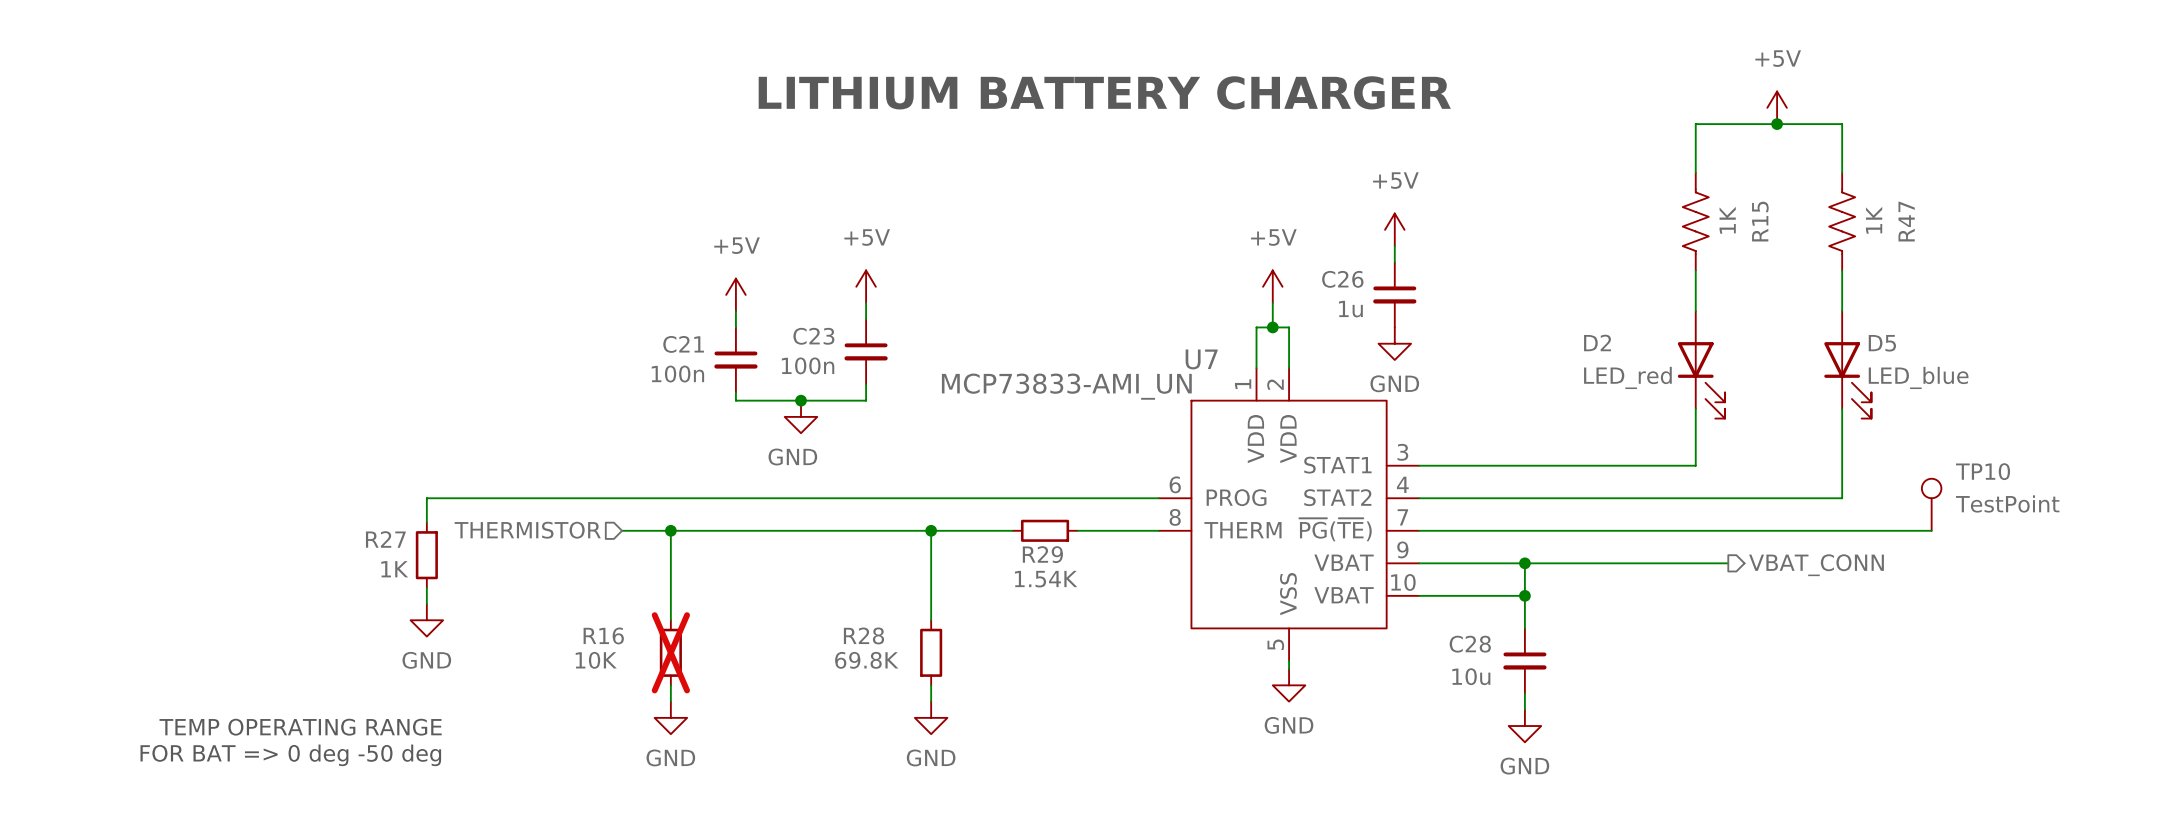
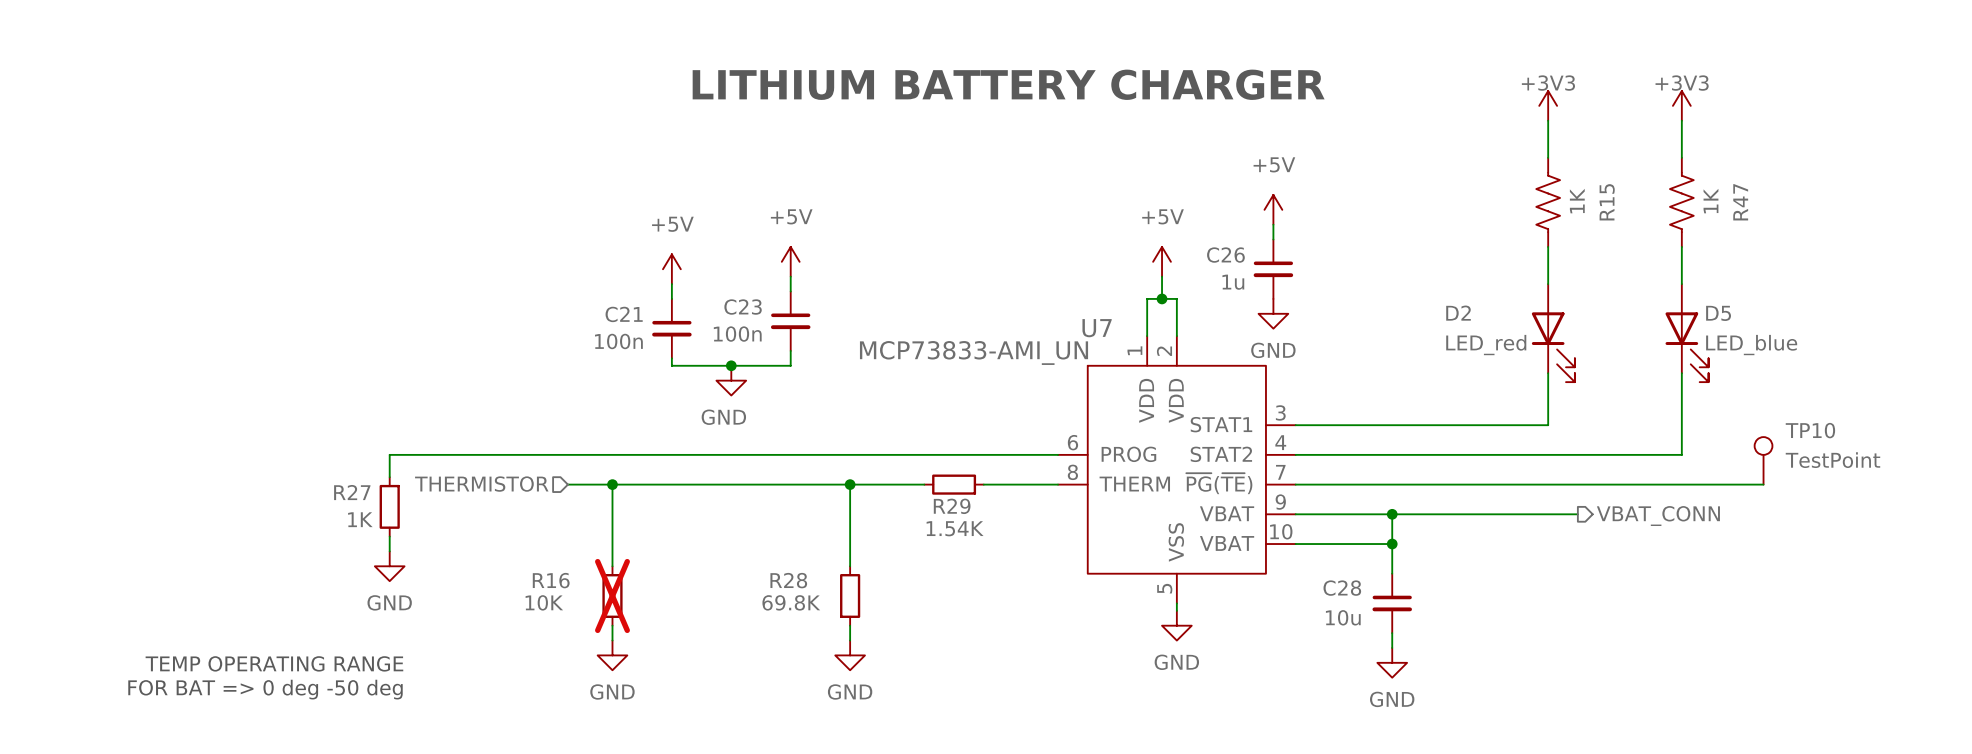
power symbol: +5V (1777, 107) -> none
power symbol: none -> +3V3 (1548, 105)
power symbol: none -> +3V3 (1681, 105)
junction: (1777, 124) -> none
wire: (1695, 132) (1695, 124) (1842, 124) (1842, 132) -> none

